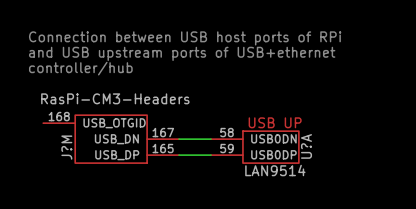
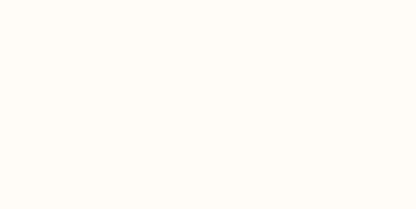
text: Connection between USB host ports of RPi (185, 38) -> none
text: and USB upstream ports of USB+ethernet (182, 53) -> none
text: controller/hub (80, 68) -> none
J?M: RasPi-CM3-Headers (111, 139) -> none
wire: (179, 139) (211, 139) -> none
U?A: LAN9514 (254, 147) -> none
wire: (179, 155) (211, 155) -> none

